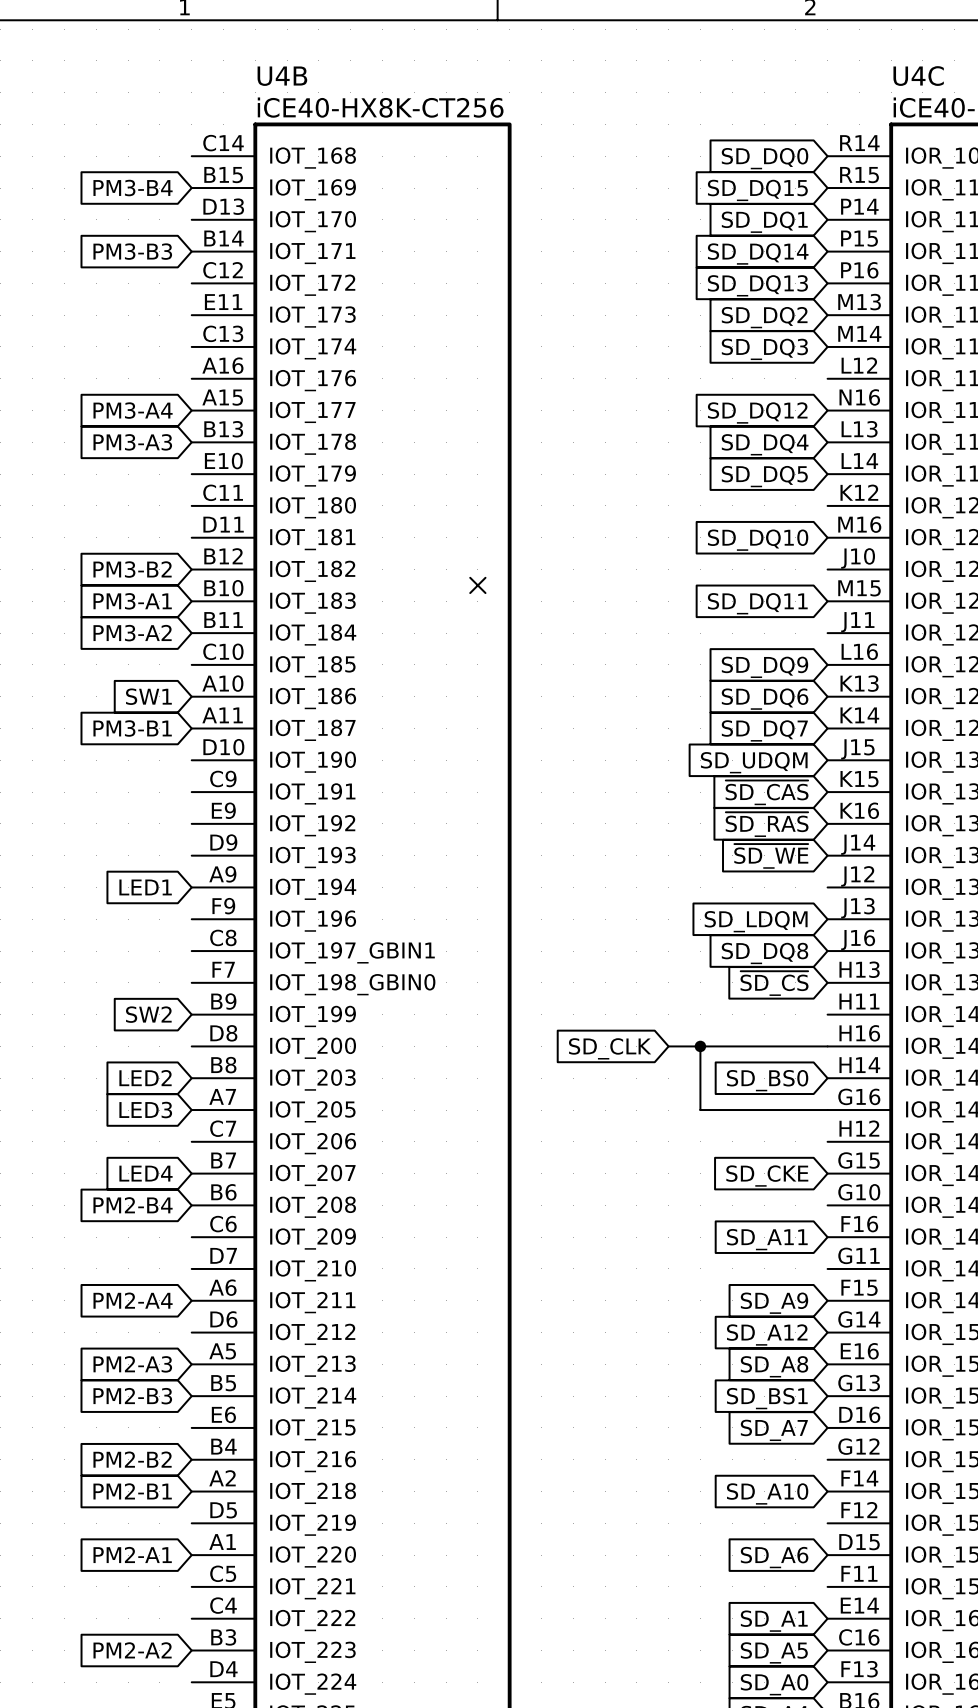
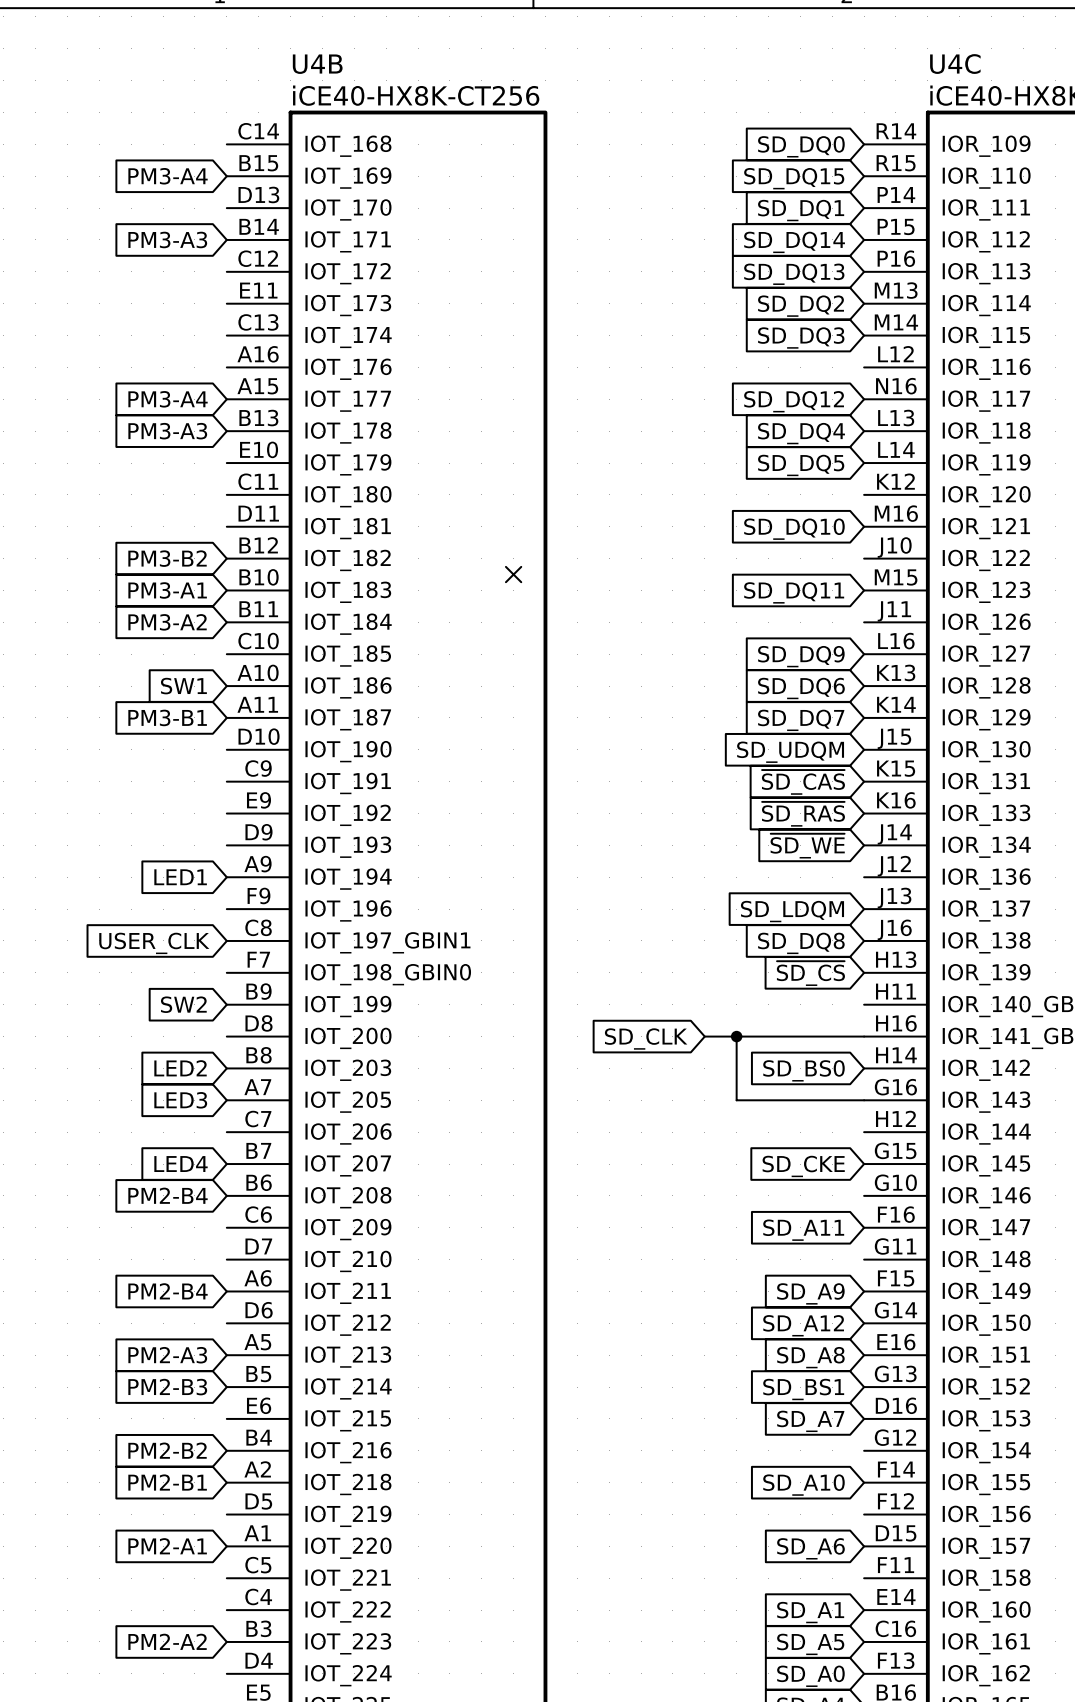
global label: PM3-B4 (133, 188) -> PM3-A4 (168, 176)
global label: PM3-B3 (132, 251) -> PM3-A3 (167, 239)
global label: none -> USER_CLK (154, 943)
global label: PM2-A4 (133, 1300) -> PM2-B4 (168, 1291)

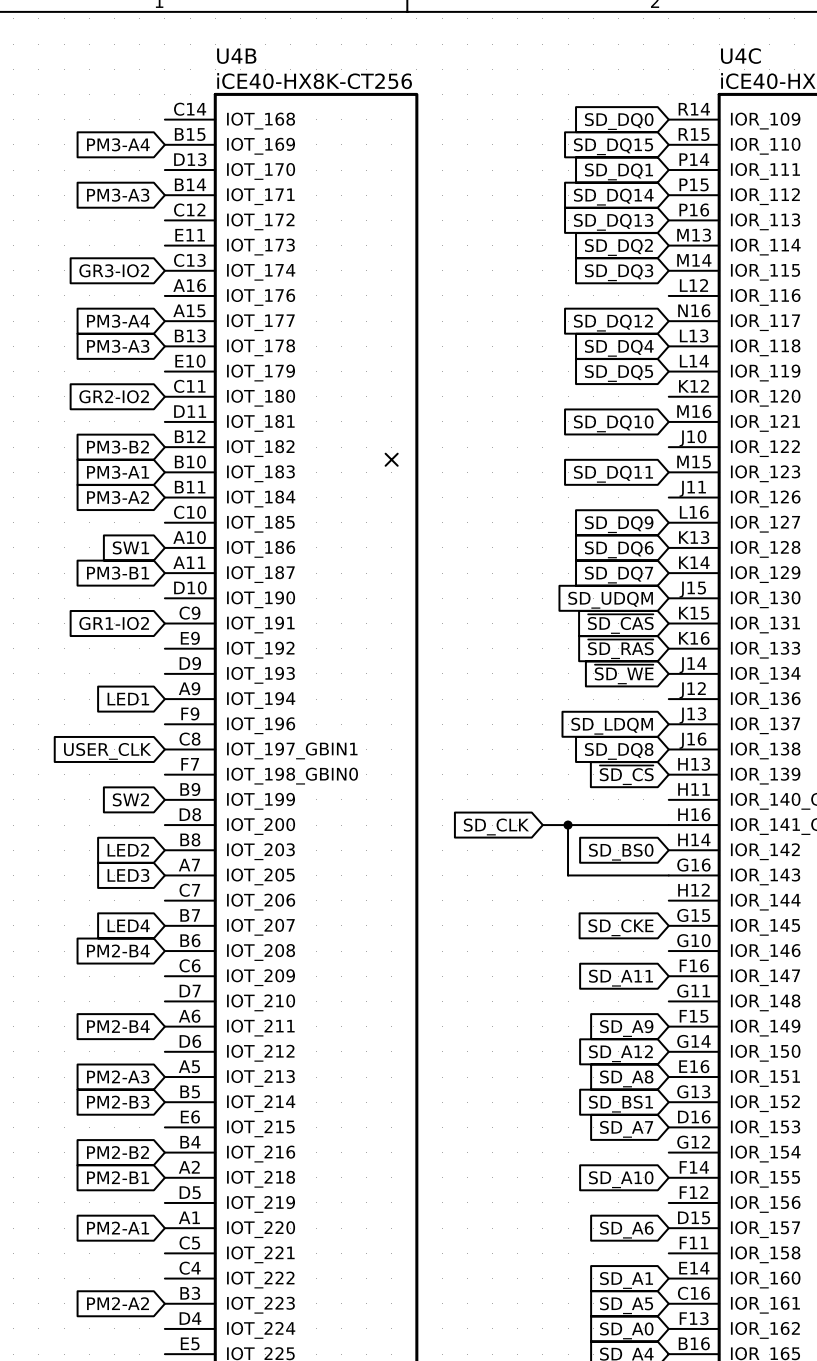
global label: none -> GR3-IO2 (114, 270)
global label: none -> GR2-IO2 (114, 396)
global label: none -> GR1-IO2 (114, 623)

